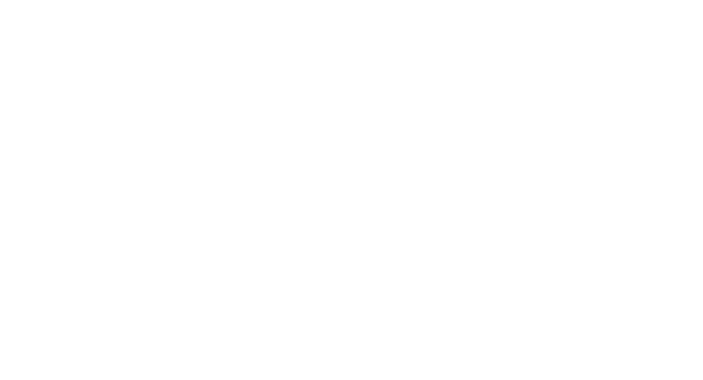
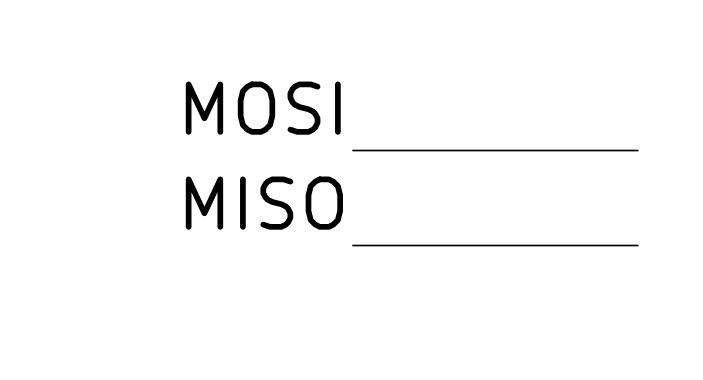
label: none -> MOSI (263, 108)
wire: none -> (352, 150) (637, 150)
label: none -> MISO (264, 203)
wire: none -> (352, 245) (637, 245)

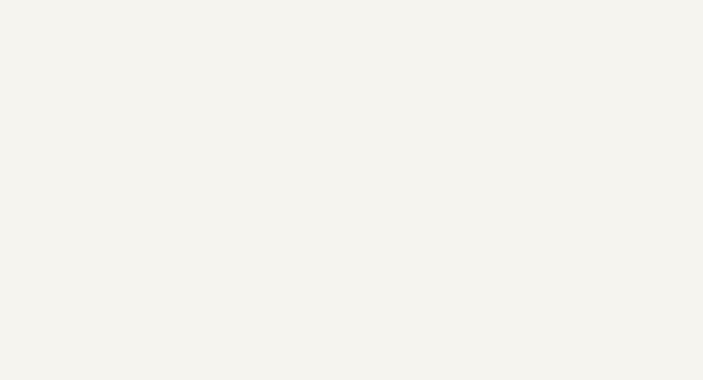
label: MOSI (263, 108) -> none
wire: (352, 150) (637, 150) -> none
label: MISO (264, 203) -> none
wire: (352, 245) (637, 245) -> none

